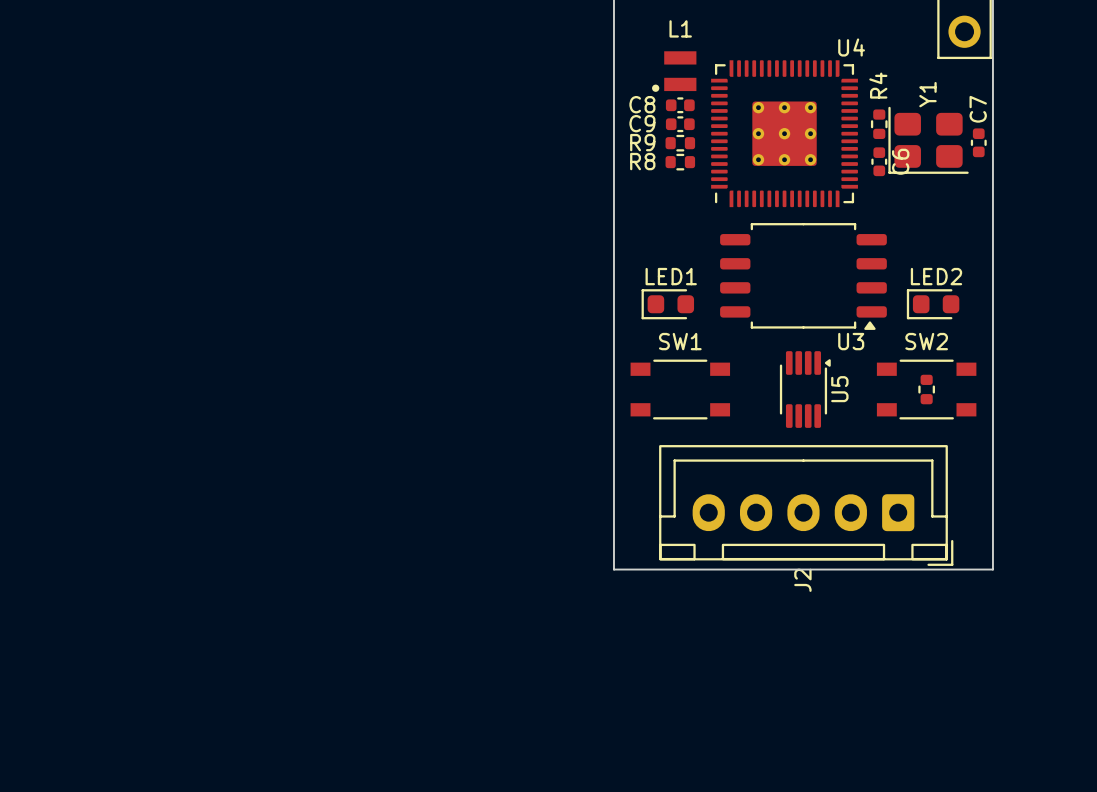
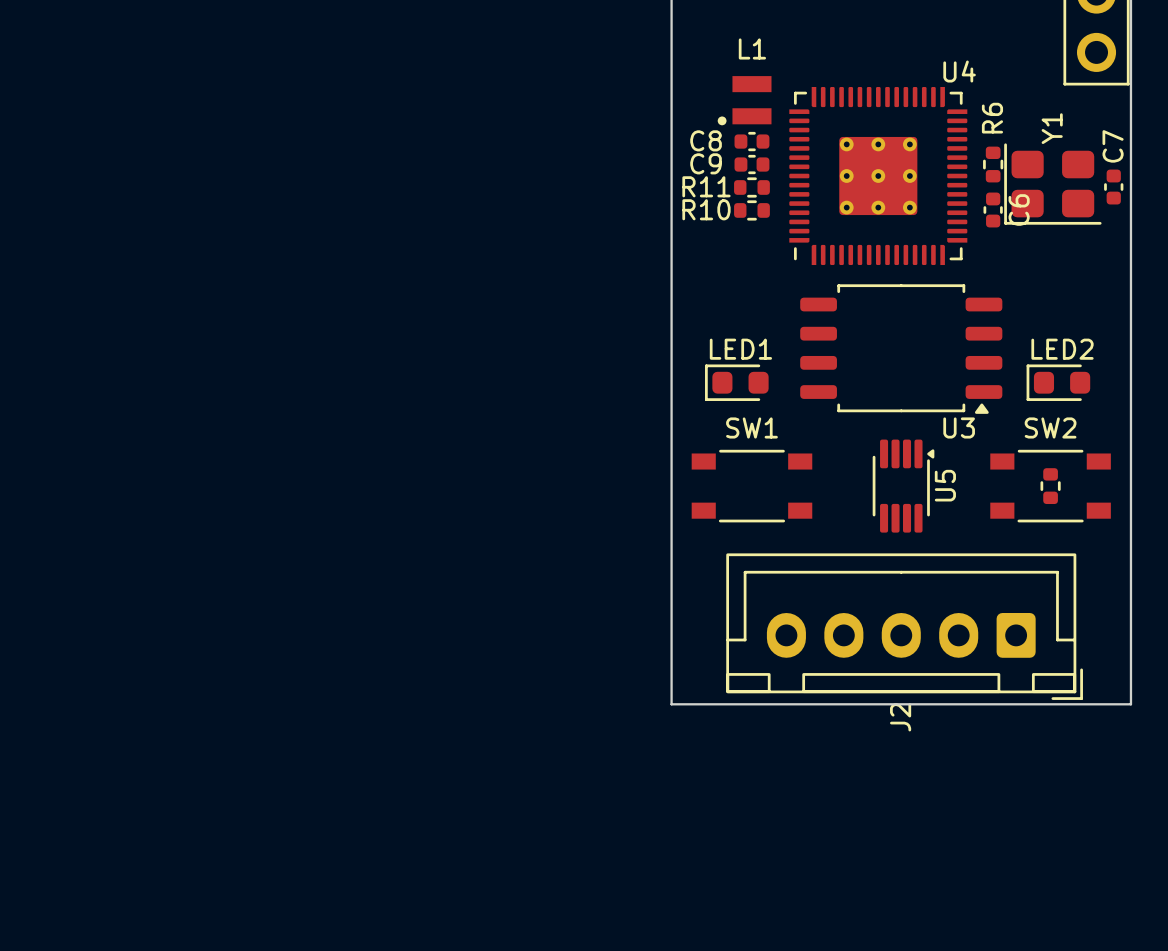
R4 name: R4 (878, 85) -> R6 (992, 118)
R9 name: R9 (642, 142) -> R11 (706, 186)
R8 name: R8 (642, 161) -> R10 (706, 209)

